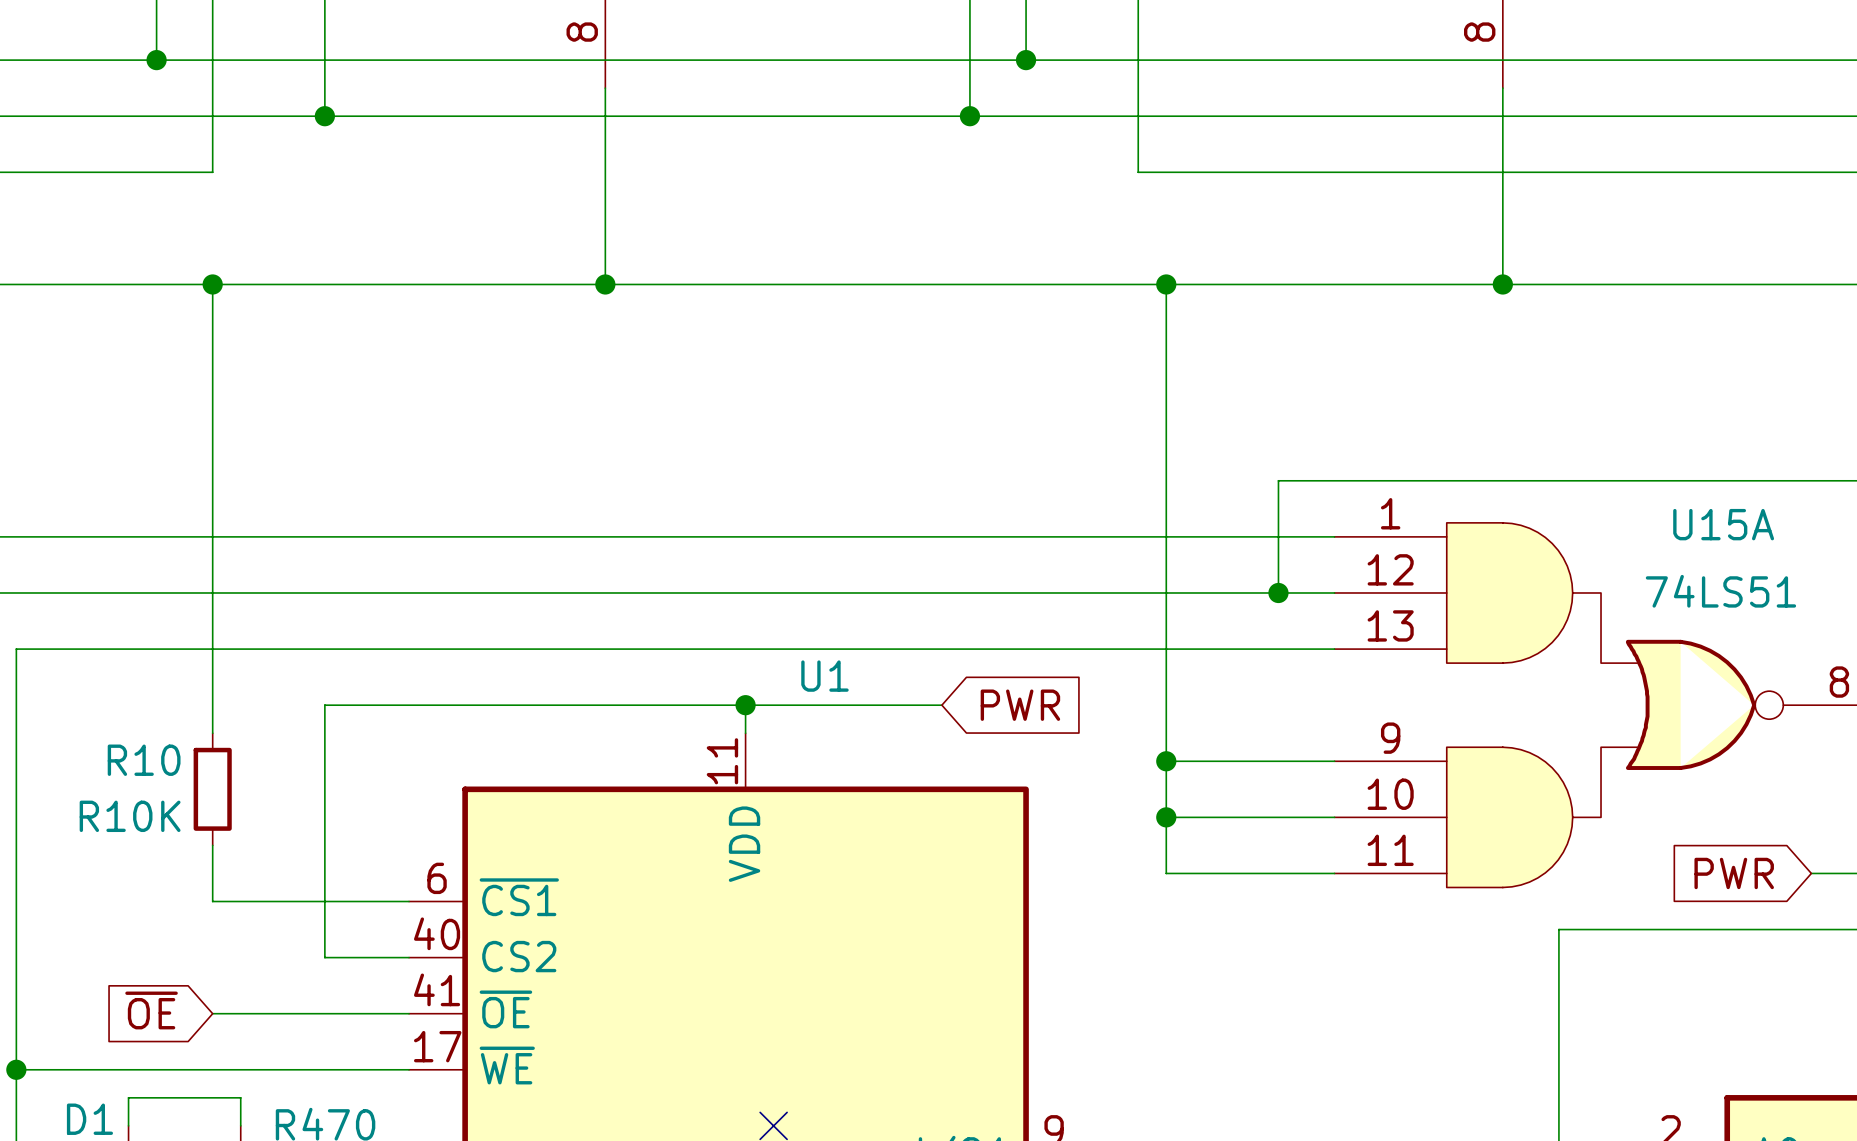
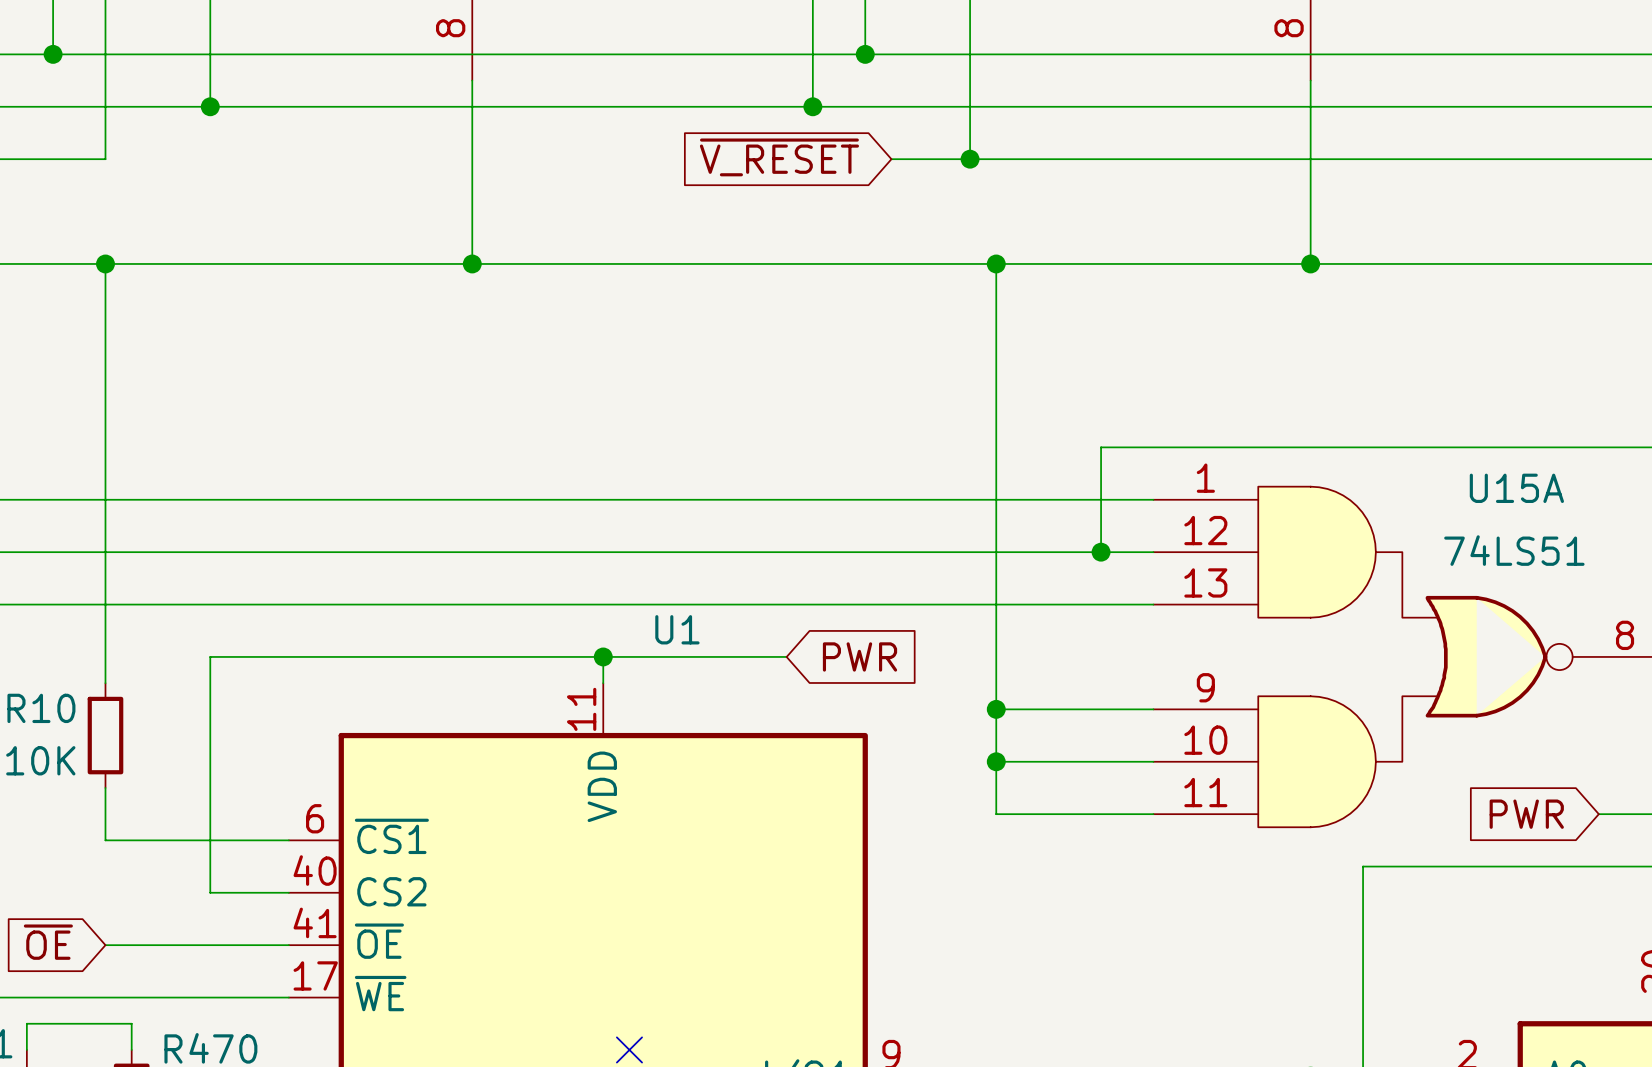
global label: none -> ~{V_RESET} (779, 157)
wire: none -> (891, 159) (970, 159)
junction: none -> (970, 159)

